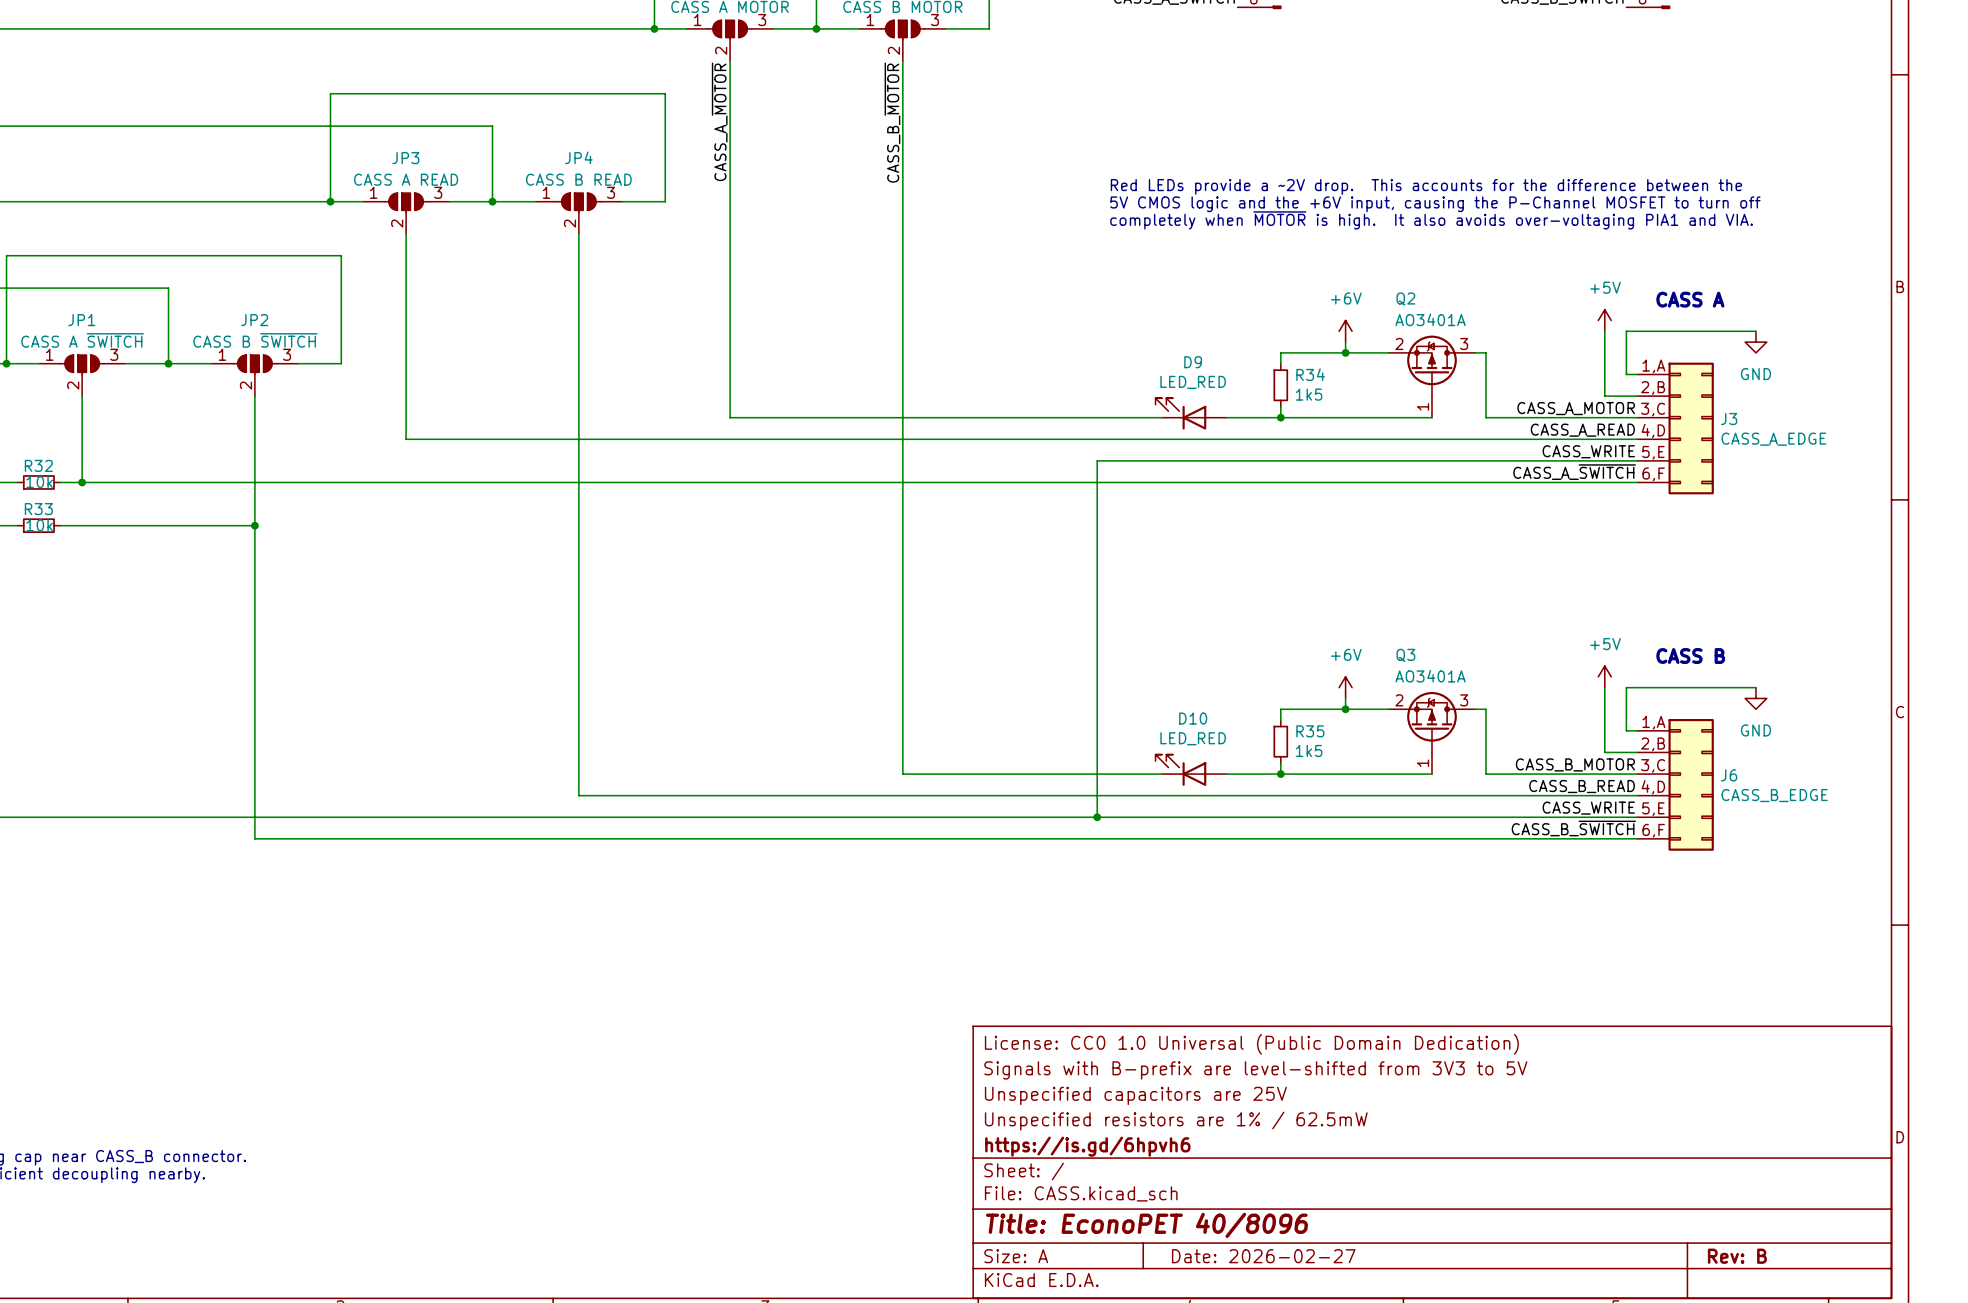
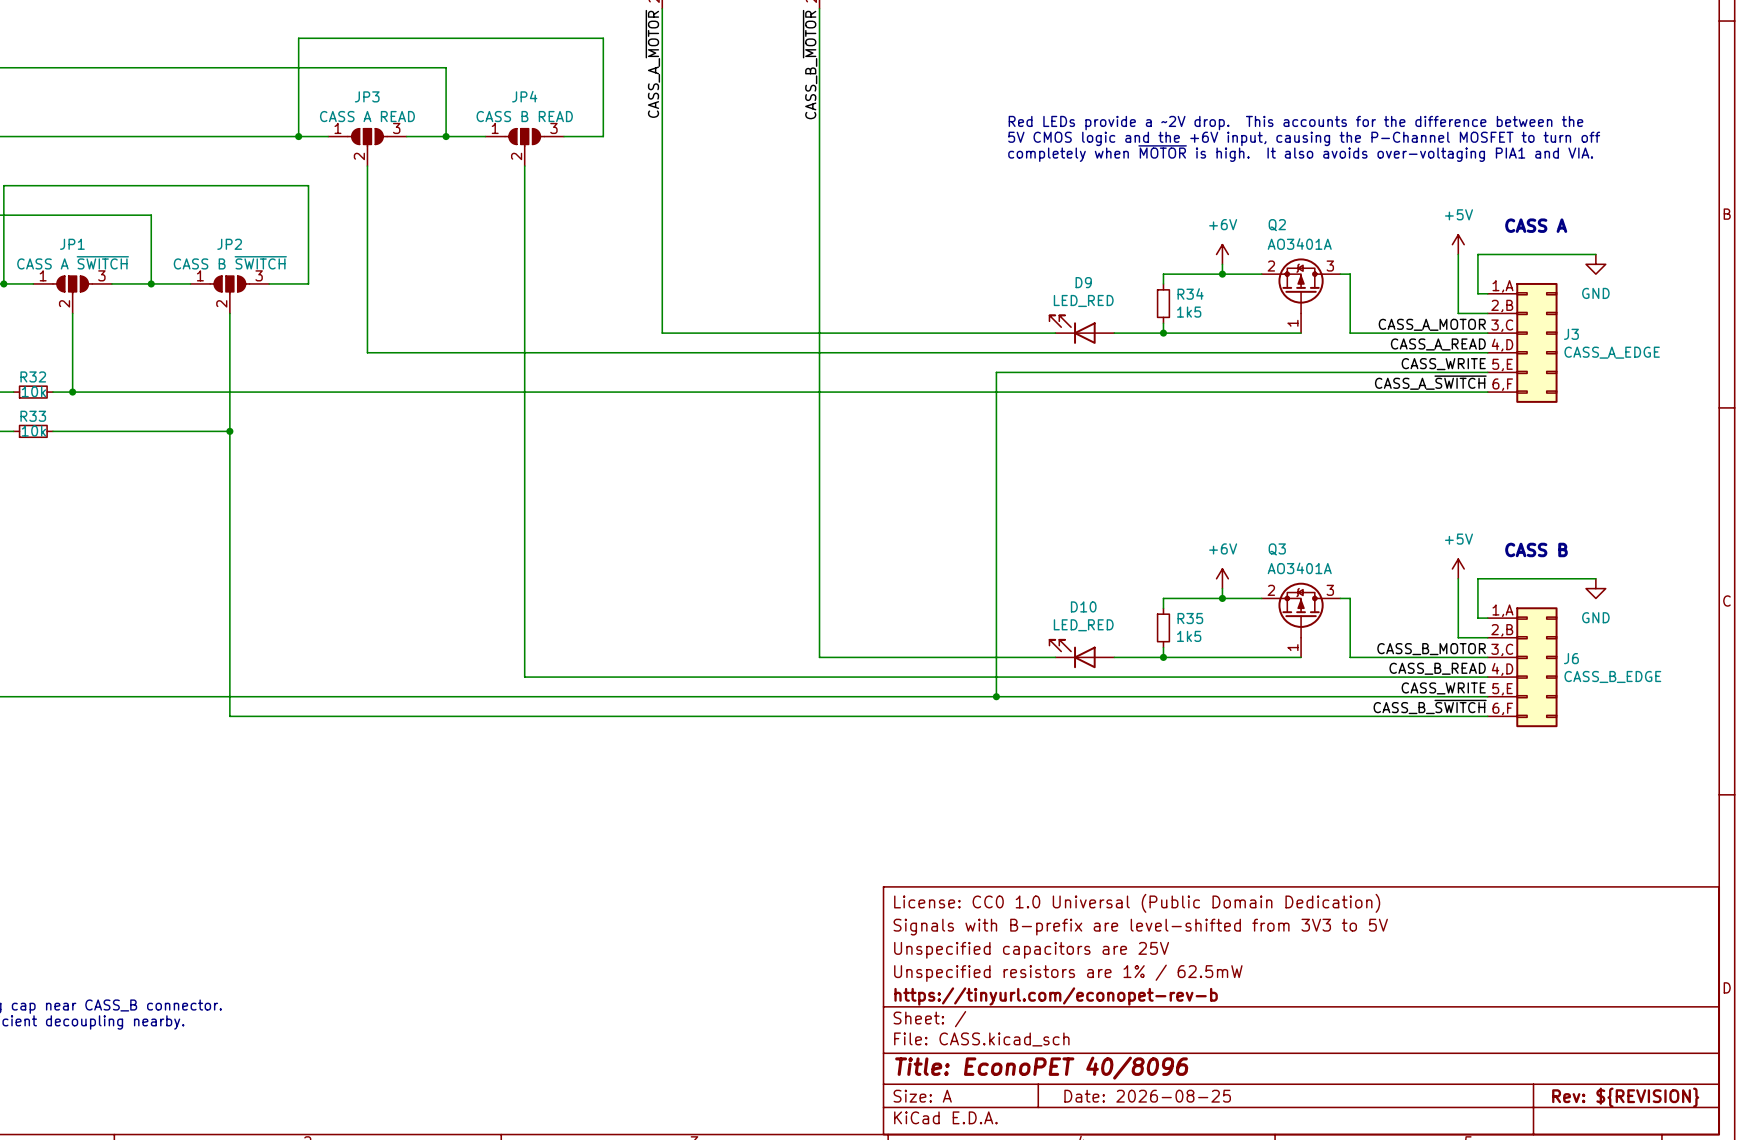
title block: https://is.gd/6hpvh6 (1087, 1146) -> https://tinyurl.com/econopet-rev-b (1056, 996)
title block: Date: 2026-02-27 (1263, 1256) -> Date: 2026-08-25 (1147, 1096)
title block: Rev: B (1737, 1256) -> Rev: ${REVISION} (1625, 1097)

